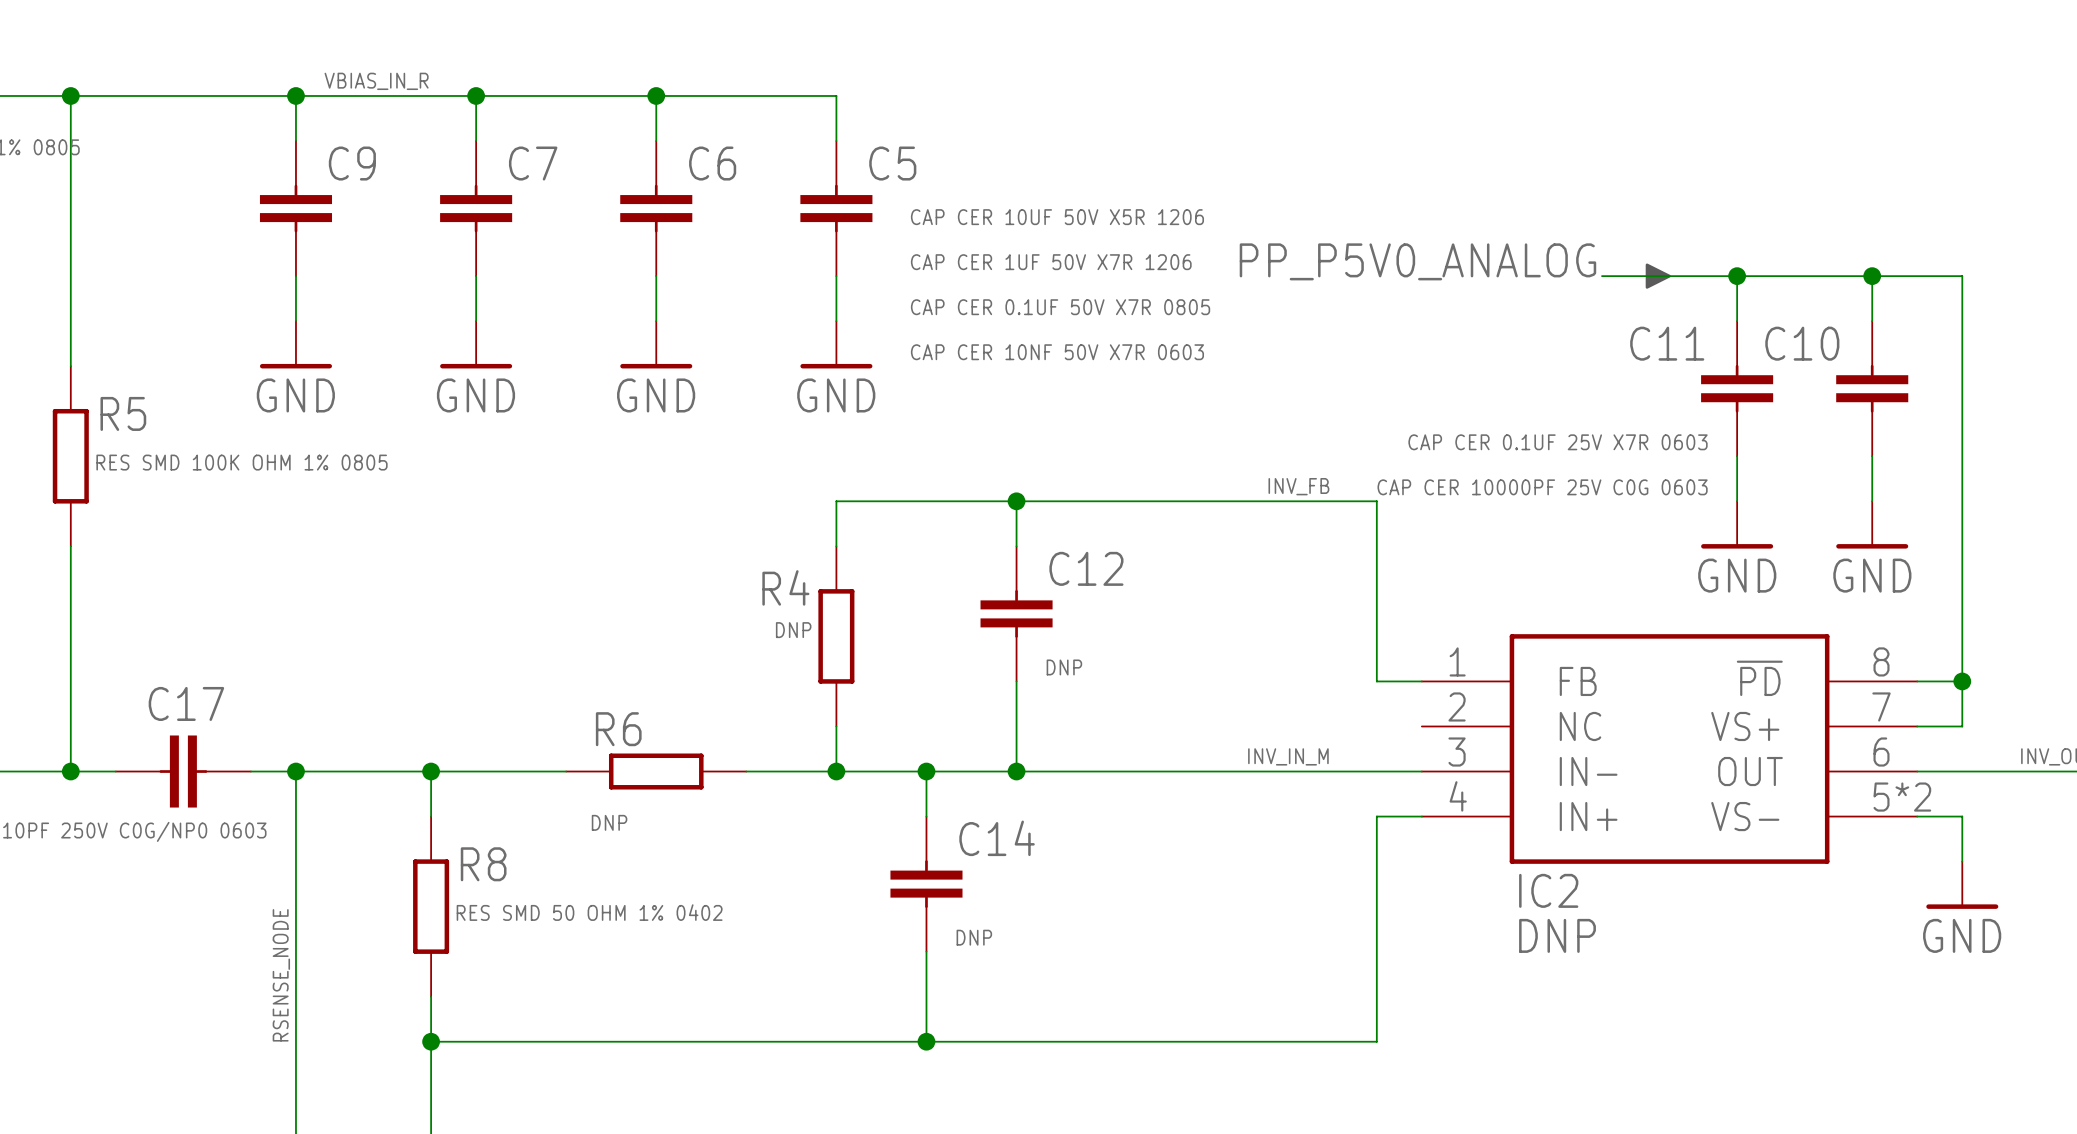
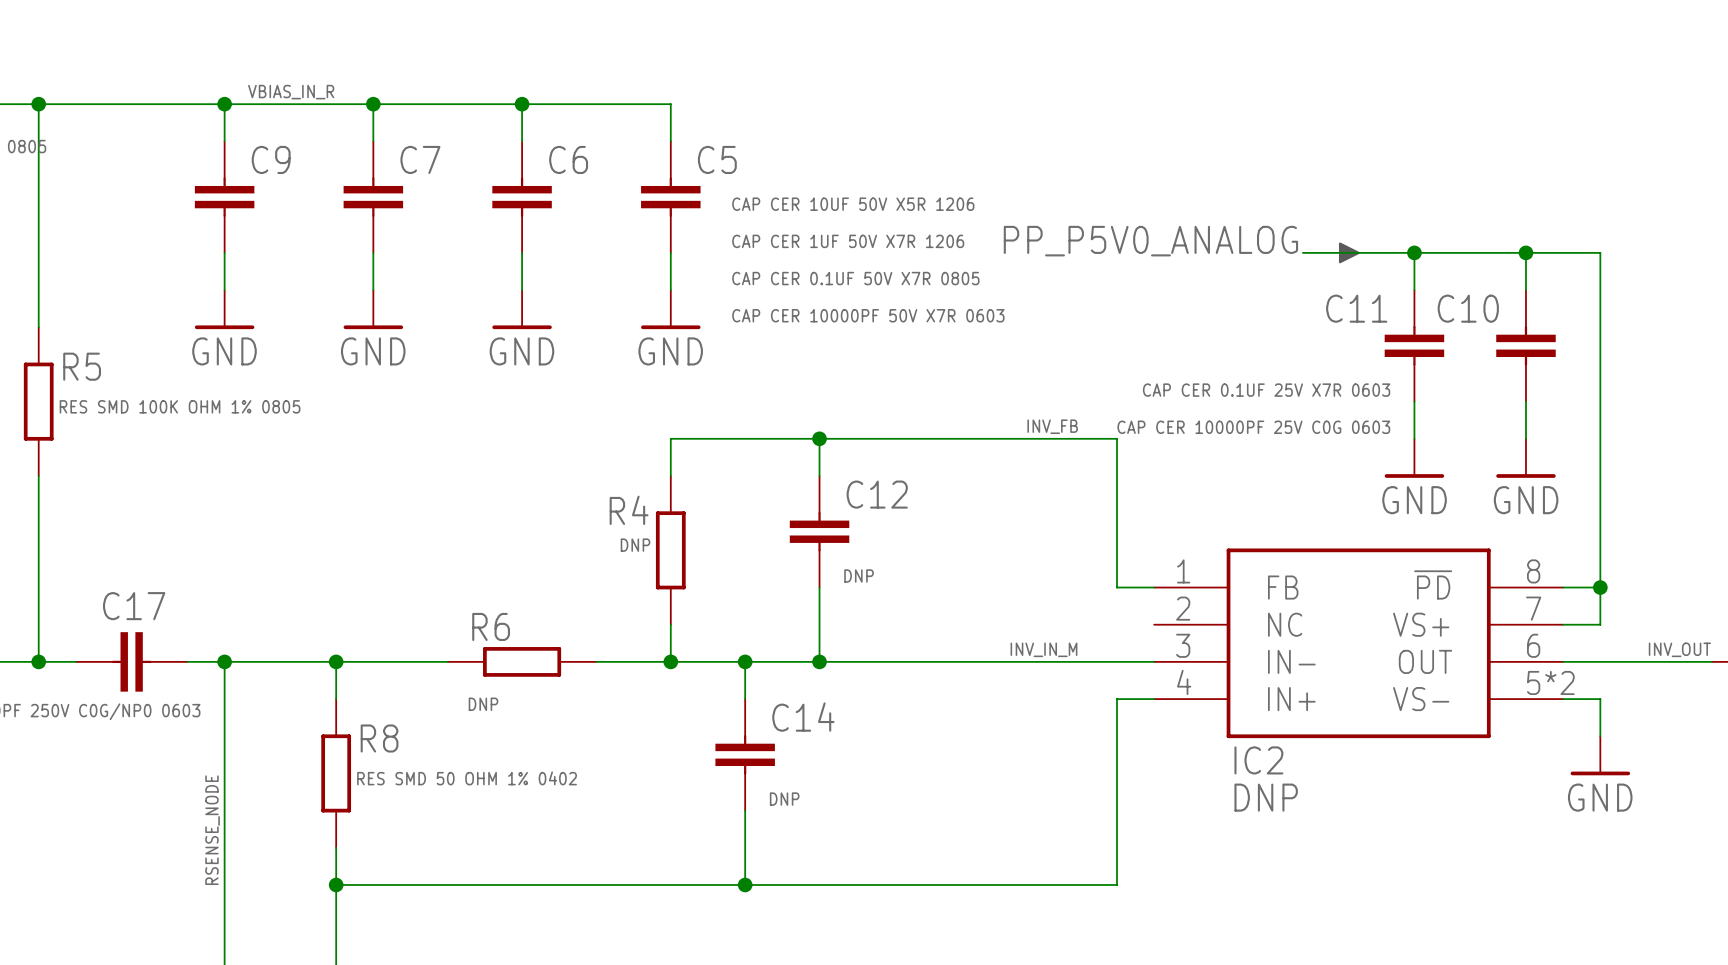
C9 value: CAP CER 10NF 50V X7R 0603 (1057, 352) -> CAP CER 10000PF 50V X7R 0603 (868, 315)

